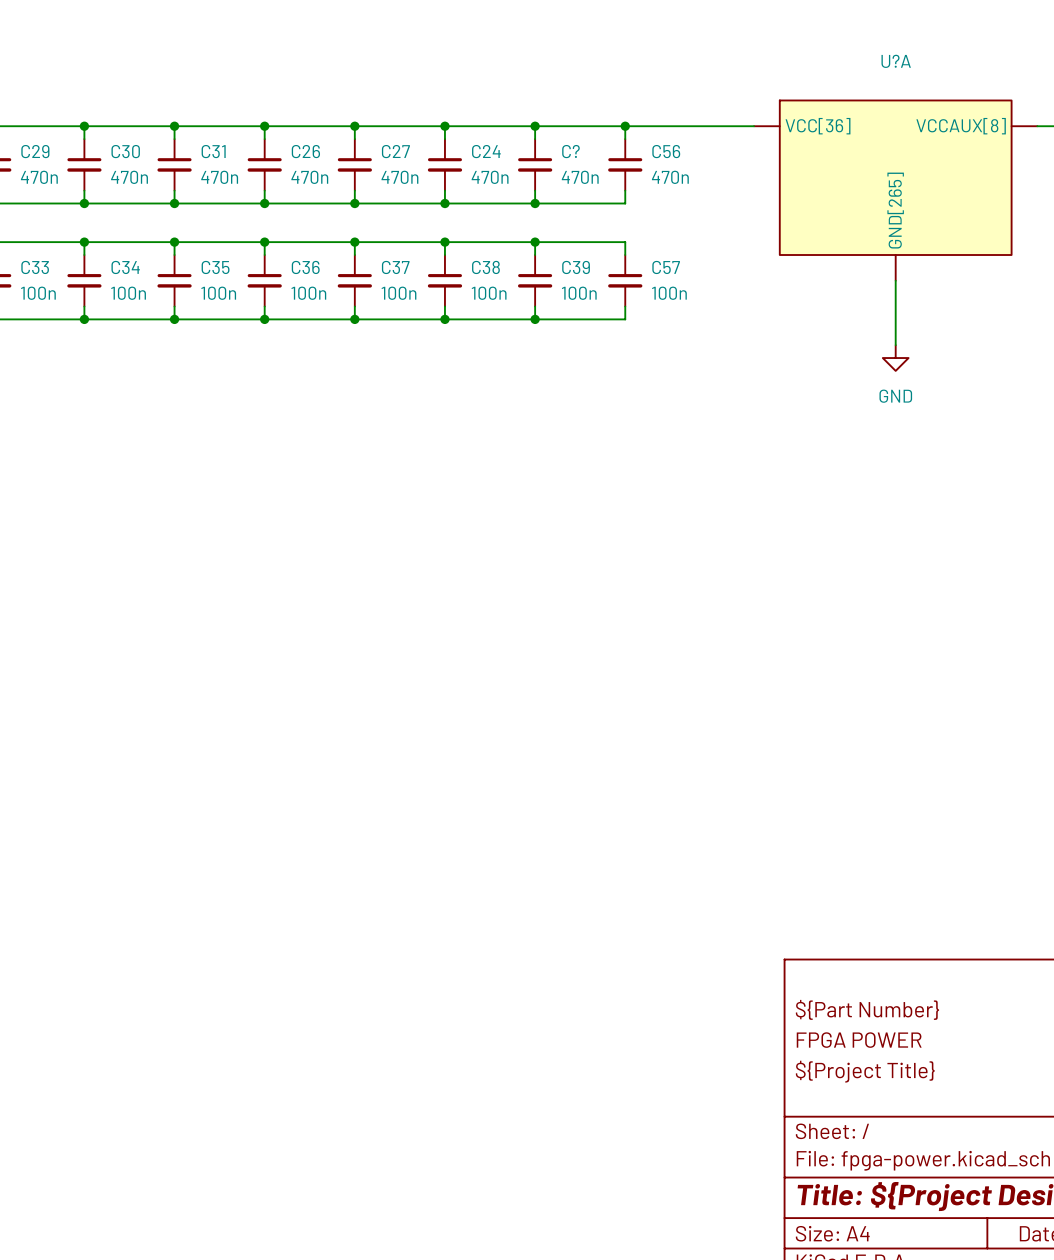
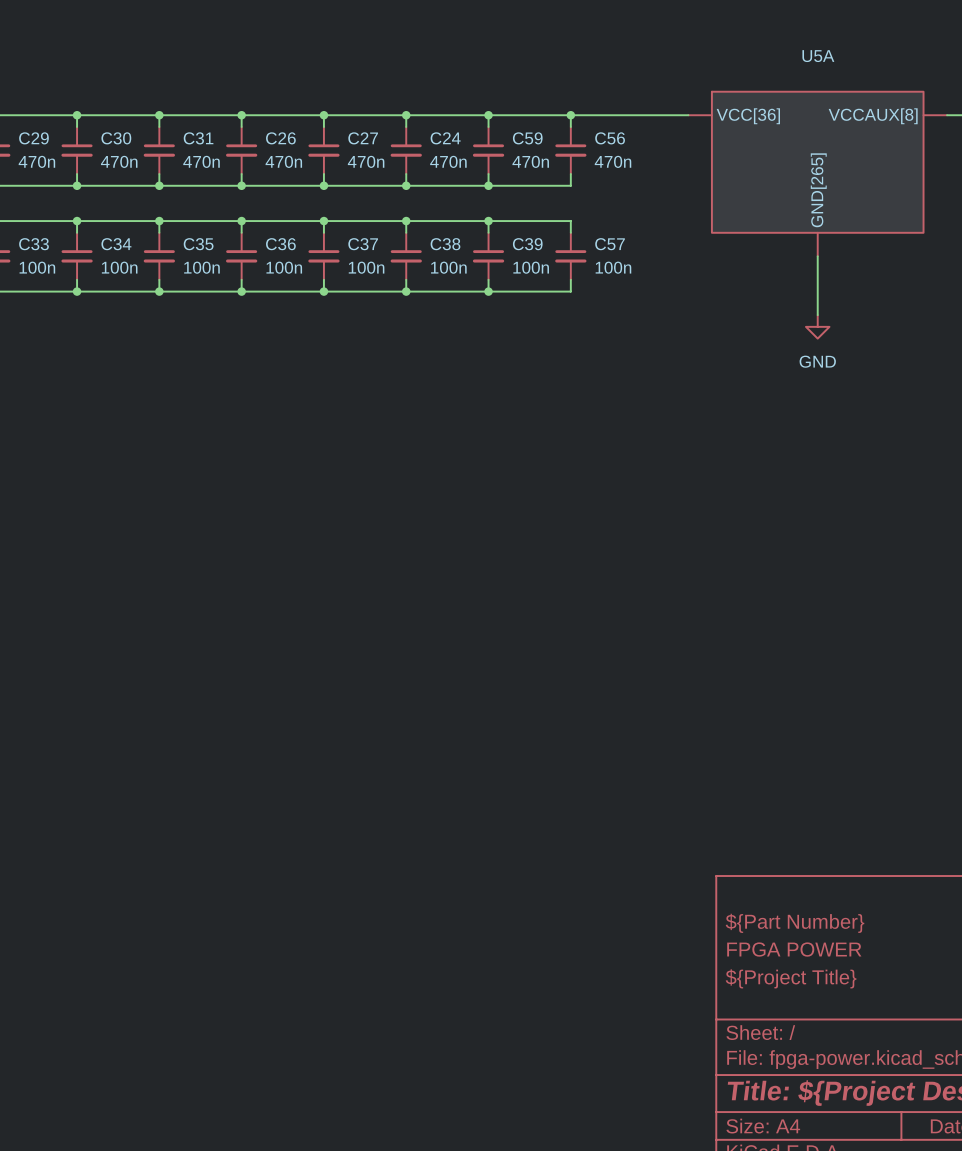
U?A name: U?A (896, 61) -> U5A (818, 56)
C? name: C? (570, 151) -> C59 (527, 138)

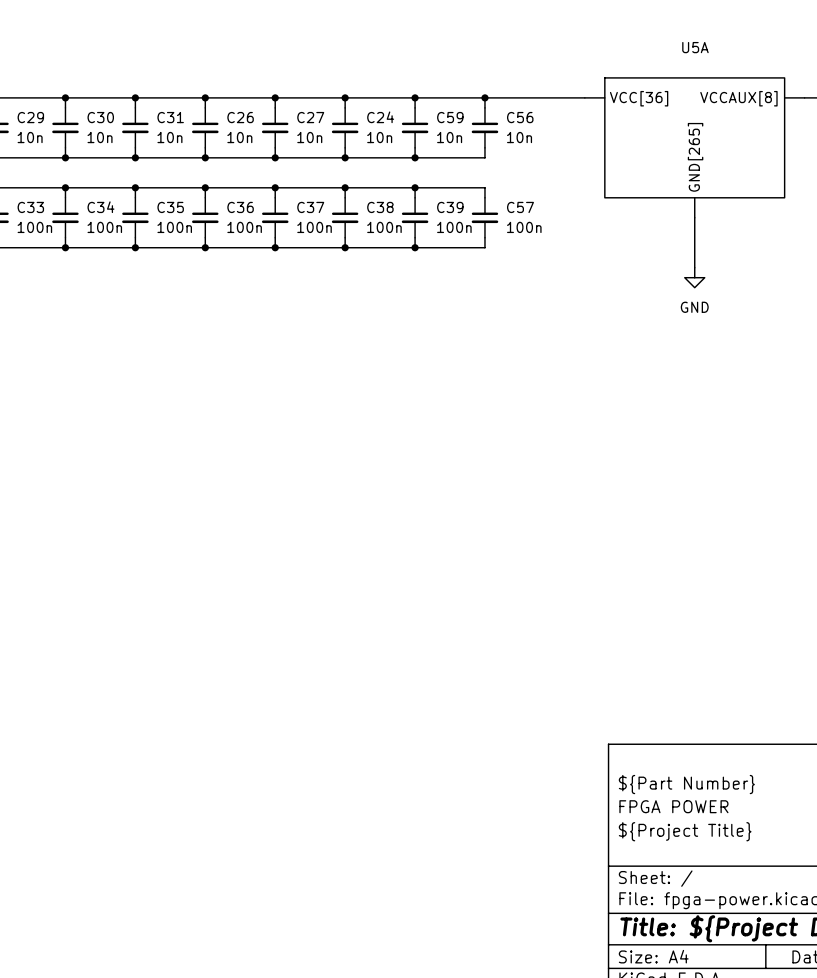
C29 value: 470n (36, 161) -> 10n (30, 137)
C30 value: 470n (119, 161) -> 10n (100, 137)
C31 value: 470n (201, 161) -> 10n (169, 137)
C26 value: 470n (283, 161) -> 10n (239, 137)
C27 value: 470n (366, 161) -> 10n (309, 137)
C24 value: 470n (448, 161) -> 10n (379, 137)
C59 value: 470n (530, 161) -> 10n (449, 137)
C56 value: 470n (613, 161) -> 10n (519, 137)

